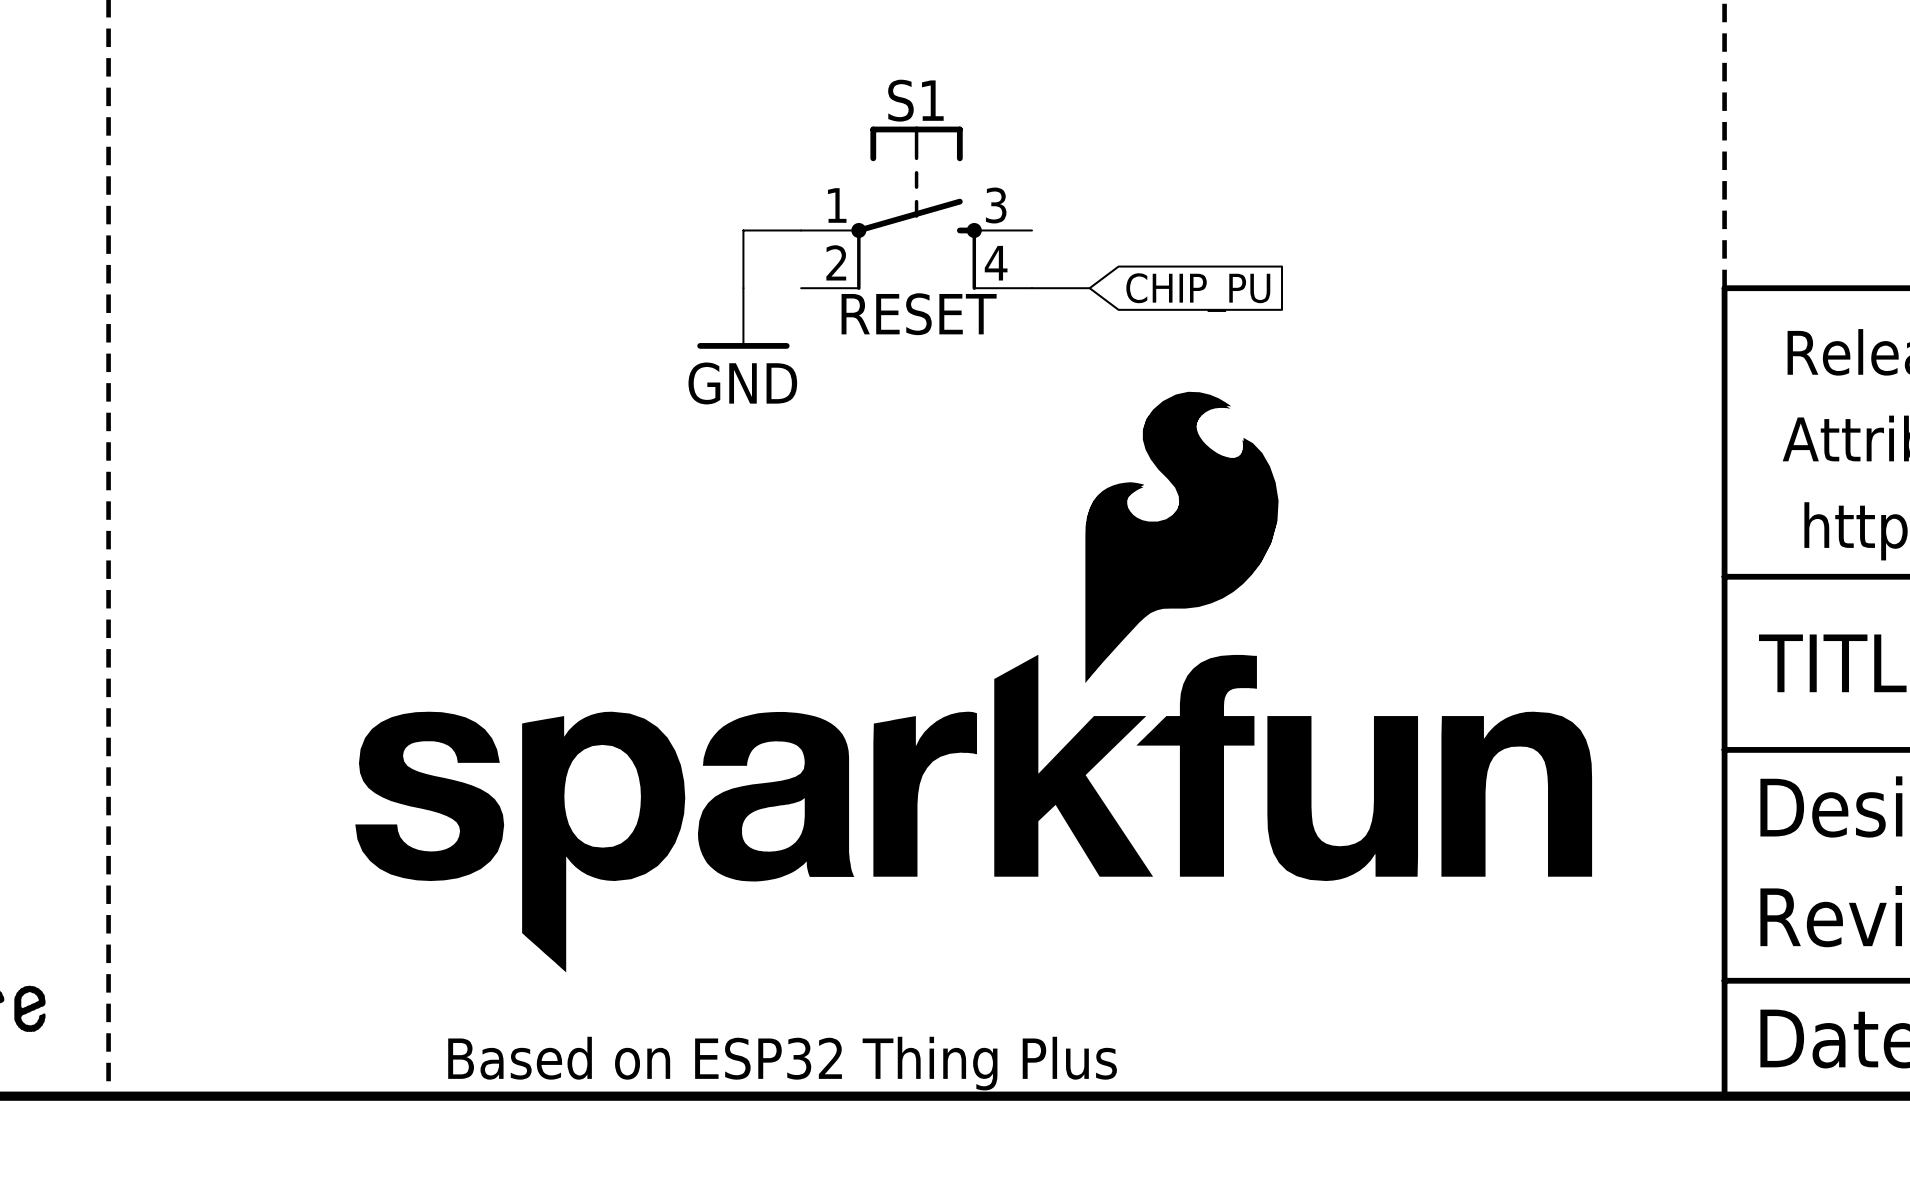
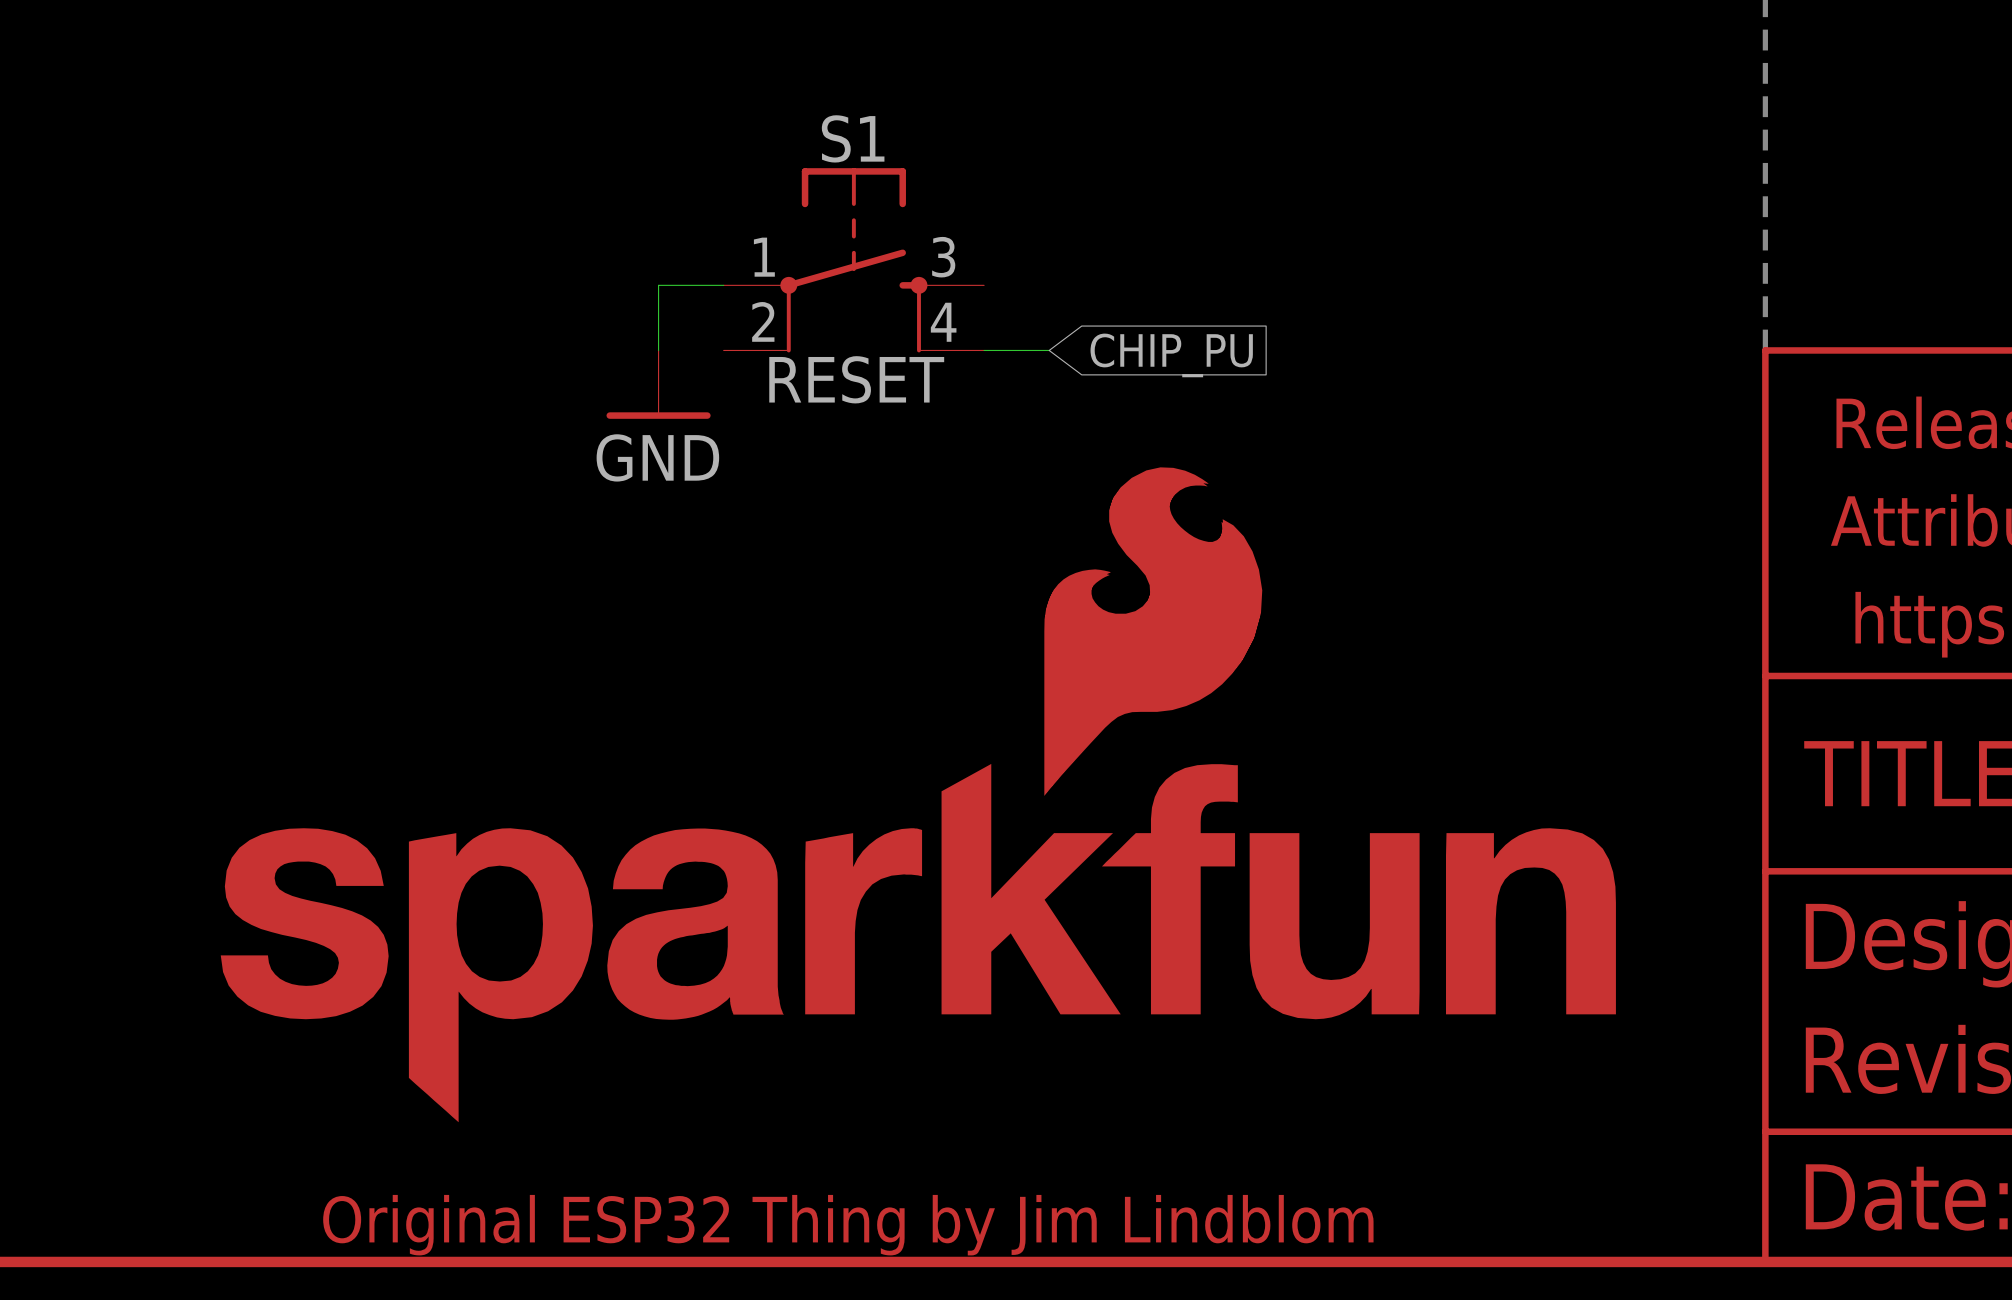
text: Based on ESP32 Thing Plus (782, 1063) -> Original ESP32 Thing by Jim Lindblom (848, 1225)

